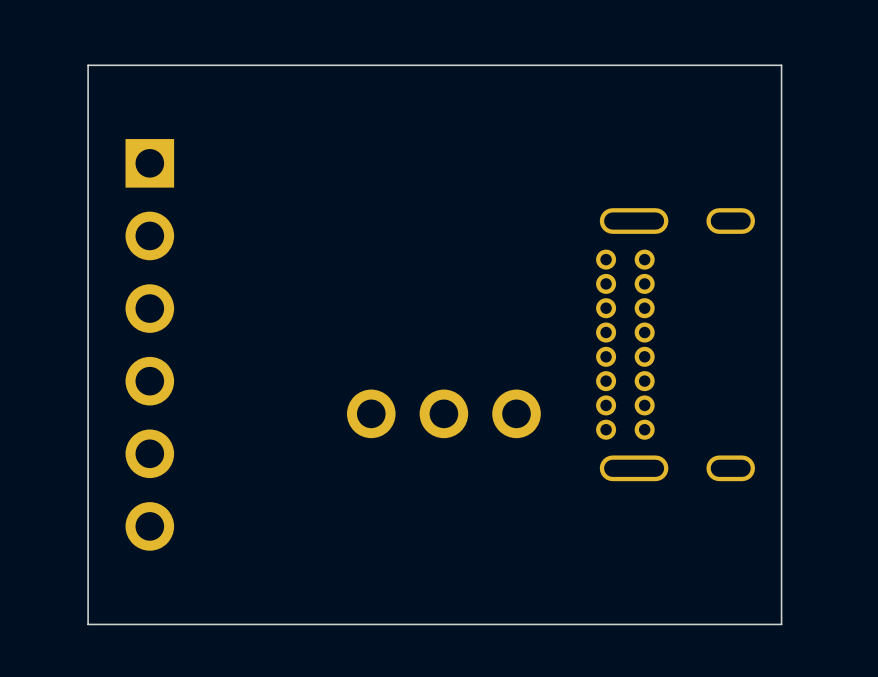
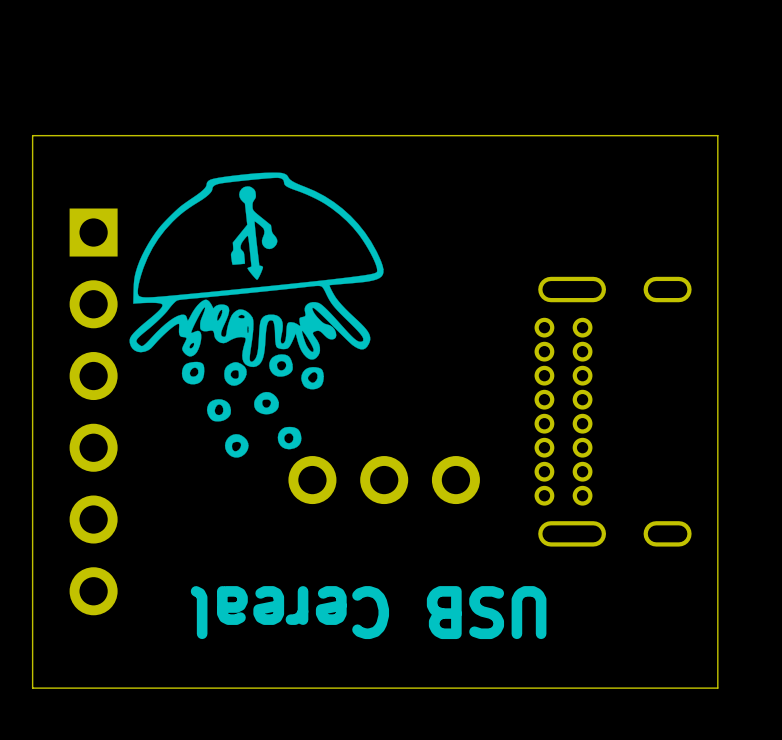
drawing: none -> [129, 172, 384, 458]
text: none -> USB Cereal (368, 612)

